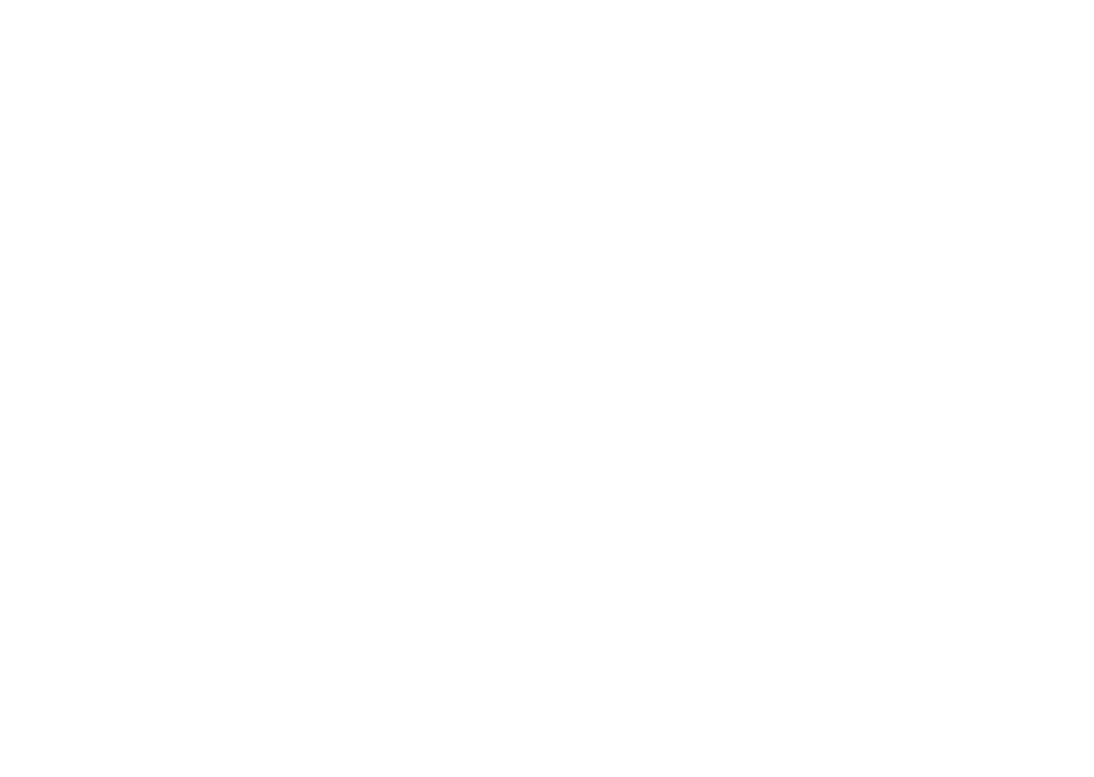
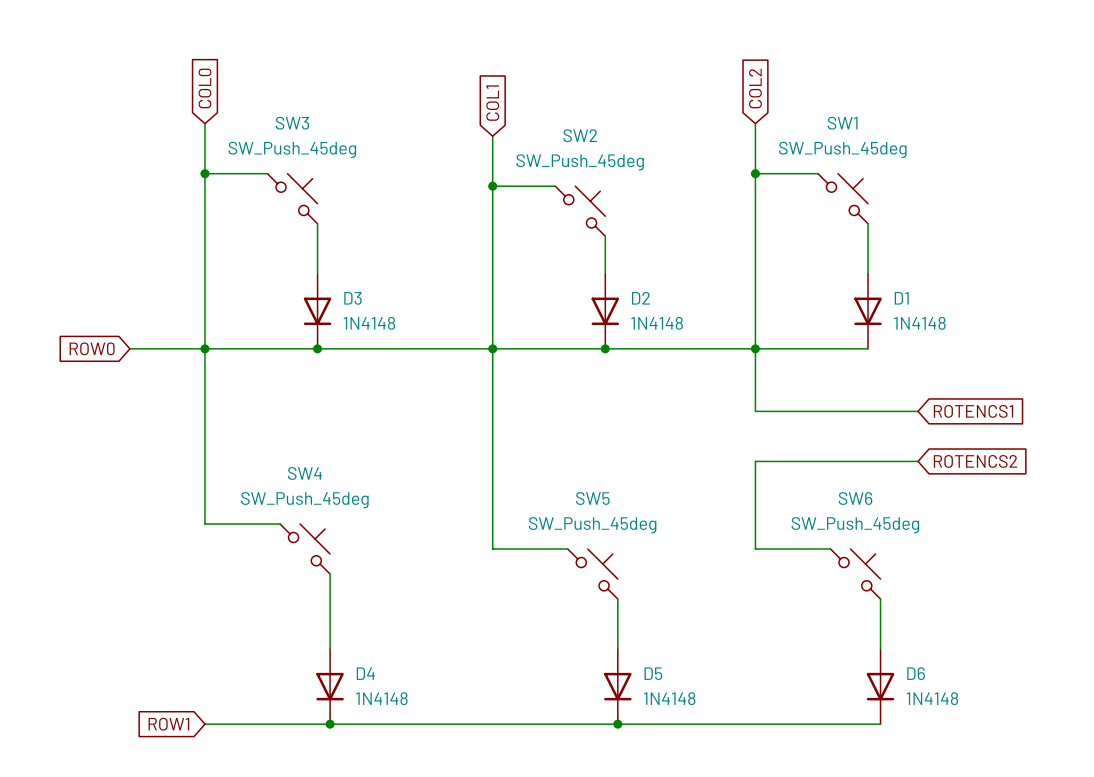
global label: none -> COL0 (204, 88)
global label: none -> COL2 (755, 88)
global label: none -> COL1 (492, 103)
wire: none -> (204, 123) (204, 523) (280, 523)
wire: none -> (755, 123) (755, 411) (918, 411)
wire: none -> (492, 136) (492, 549) (567, 549)
wire: none -> (204, 173) (267, 173)
junction: none -> (204, 173)
wire: none -> (755, 173) (817, 173)
junction: none -> (755, 173)
wire: none -> (492, 186) (555, 186)
junction: none -> (492, 186)
SW3: none -> SW_Push_45deg (292, 198)
SW1: none -> SW_Push_45deg (843, 198)
SW2: none -> SW_Push_45deg (580, 211)
wire: none -> (317, 223) (317, 273)
wire: none -> (868, 223) (868, 273)
wire: none -> (605, 236) (605, 273)
D3: none -> 1N4148 (317, 311)
D2: none -> 1N4148 (605, 311)
D1: none -> 1N4148 (868, 311)
global label: none -> ROW0 (92, 348)
wire: none -> (129, 348) (868, 348)
junction: none -> (204, 348)
junction: none -> (317, 348)
junction: none -> (492, 348)
junction: none -> (605, 348)
junction: none -> (755, 348)
global label: none -> ROTENCS1 (973, 411)
wire: none -> (918, 461) (755, 461) (755, 549) (830, 549)
global label: none -> ROTENCS2 (975, 461)
SW4: none -> SW_Push_45deg (305, 549)
wire: none -> (330, 574) (330, 649)
SW5: none -> SW_Push_45deg (592, 574)
SW6: none -> SW_Push_45deg (855, 574)
wire: none -> (617, 599) (617, 649)
wire: none -> (880, 599) (880, 649)
D4: none -> 1N4148 (330, 686)
D5: none -> 1N4148 (617, 686)
D6: none -> 1N4148 (880, 686)
global label: none -> ROW1 (168, 724)
wire: none -> (204, 724) (880, 724)
junction: none -> (330, 724)
junction: none -> (617, 724)

